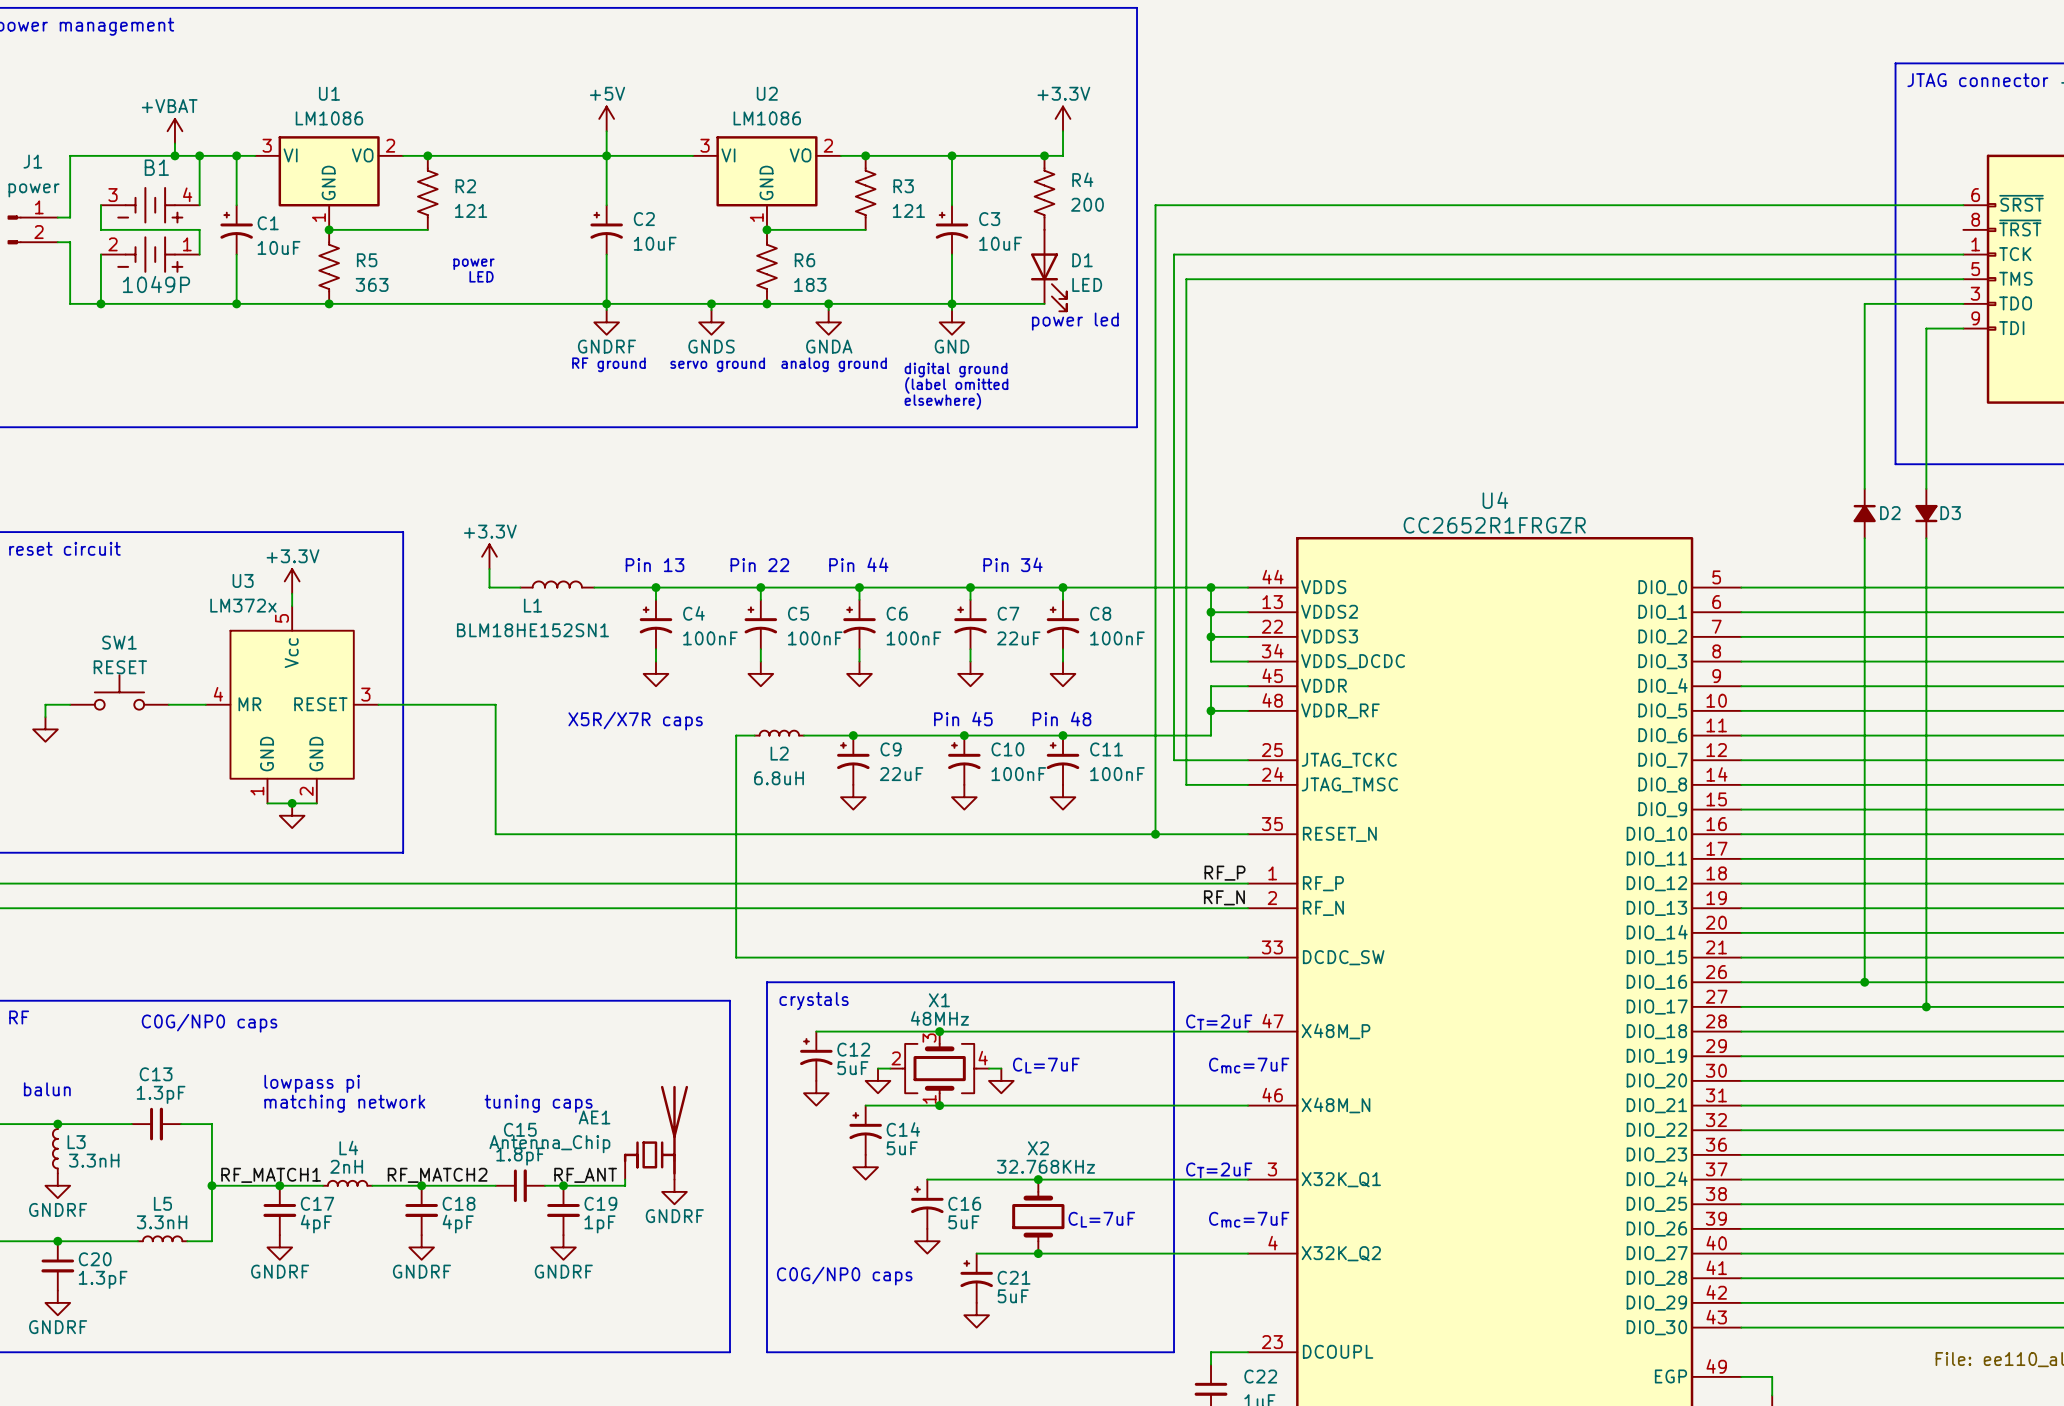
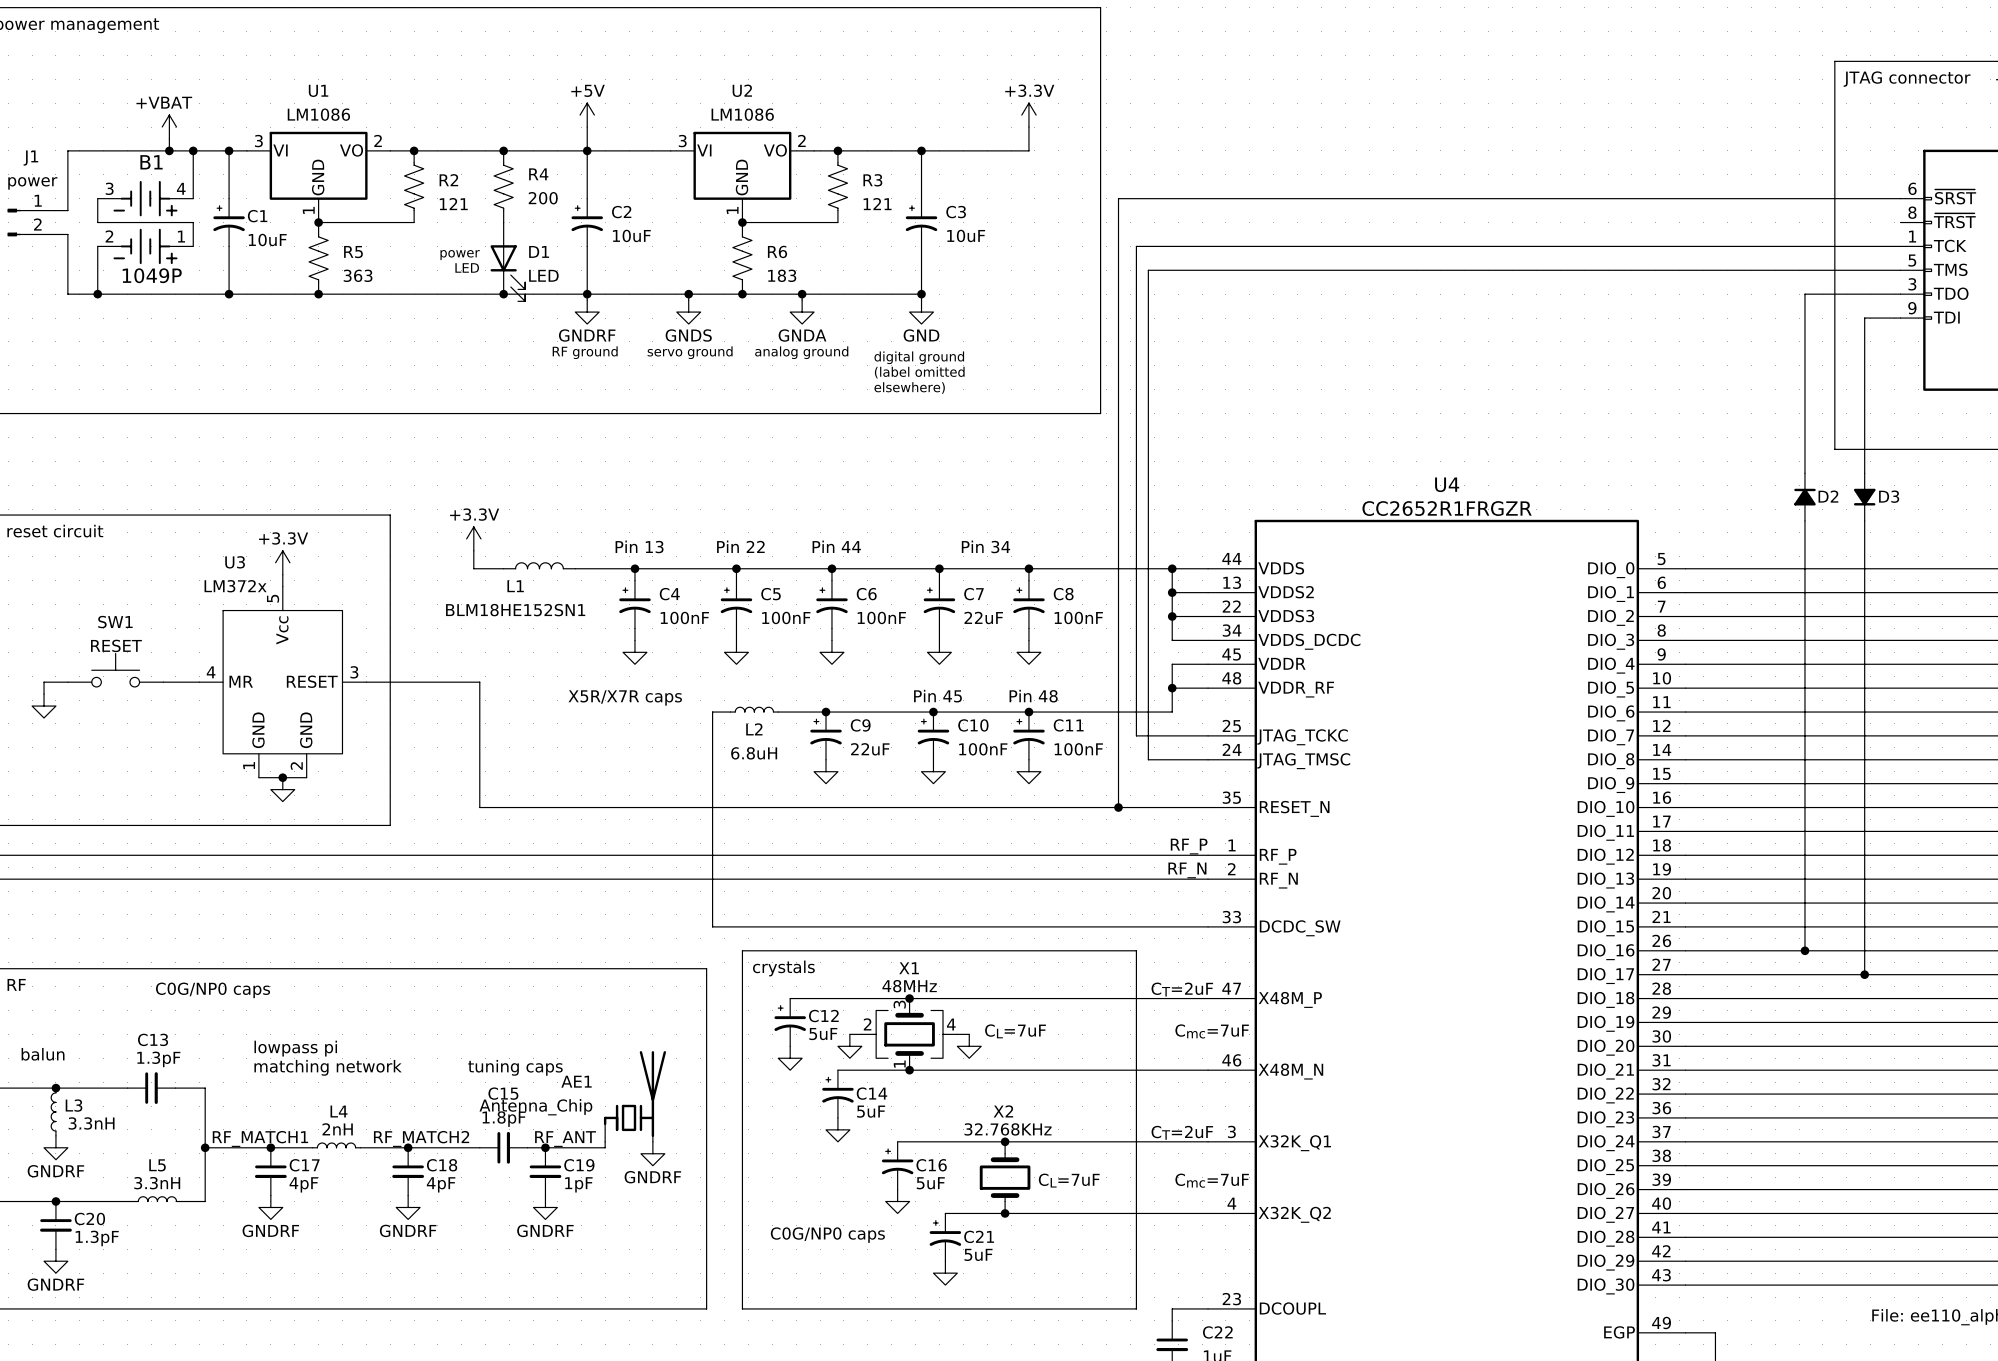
junction: none -> (503, 150)
junction: (1044, 155) -> none
R4 position: (1044, 192) -> (503, 186)
D1 position: (1048, 270) -> (507, 261)
junction: none -> (503, 294)
wire: (952, 303) (1044, 303) -> none
text: power led (1075, 321) -> none

